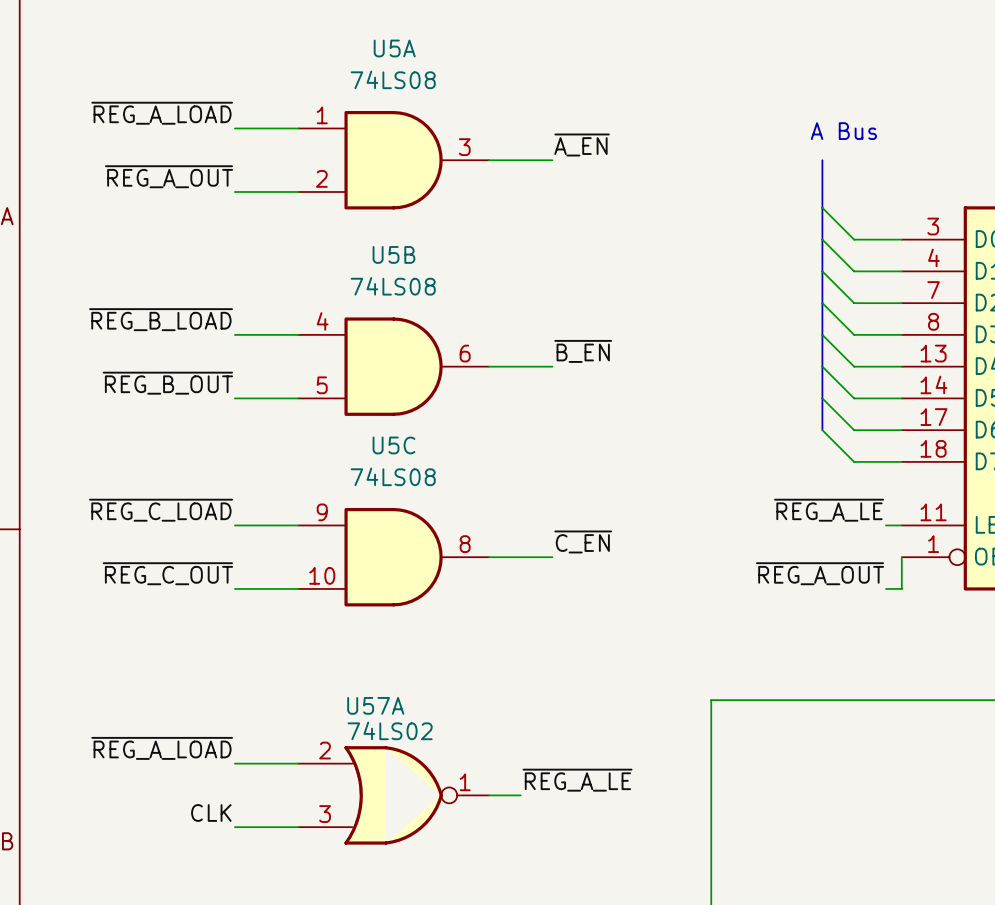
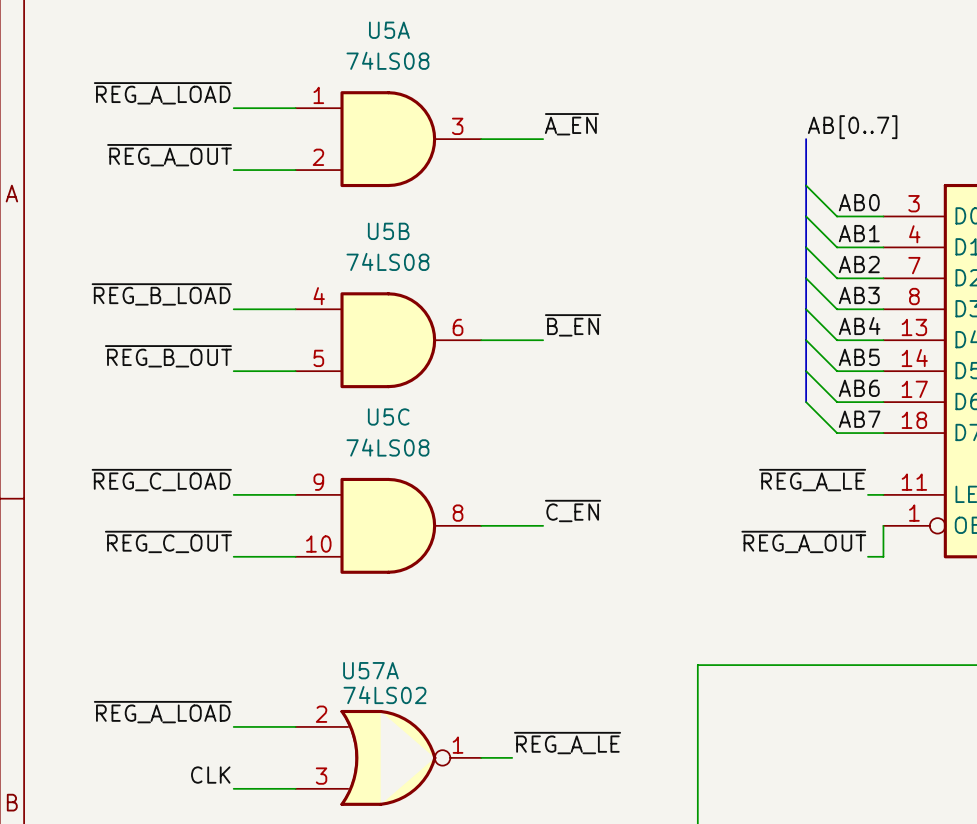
text: A Bus (843, 131) -> none
label: none -> AB[0..7] (852, 127)
label: none -> AB0 (859, 202)
label: none -> AB1 (859, 233)
label: none -> AB2 (859, 264)
label: none -> AB3 (859, 295)
label: none -> AB4 (859, 326)
label: none -> AB5 (859, 357)
label: none -> AB6 (859, 388)
label: none -> AB7 (859, 419)

